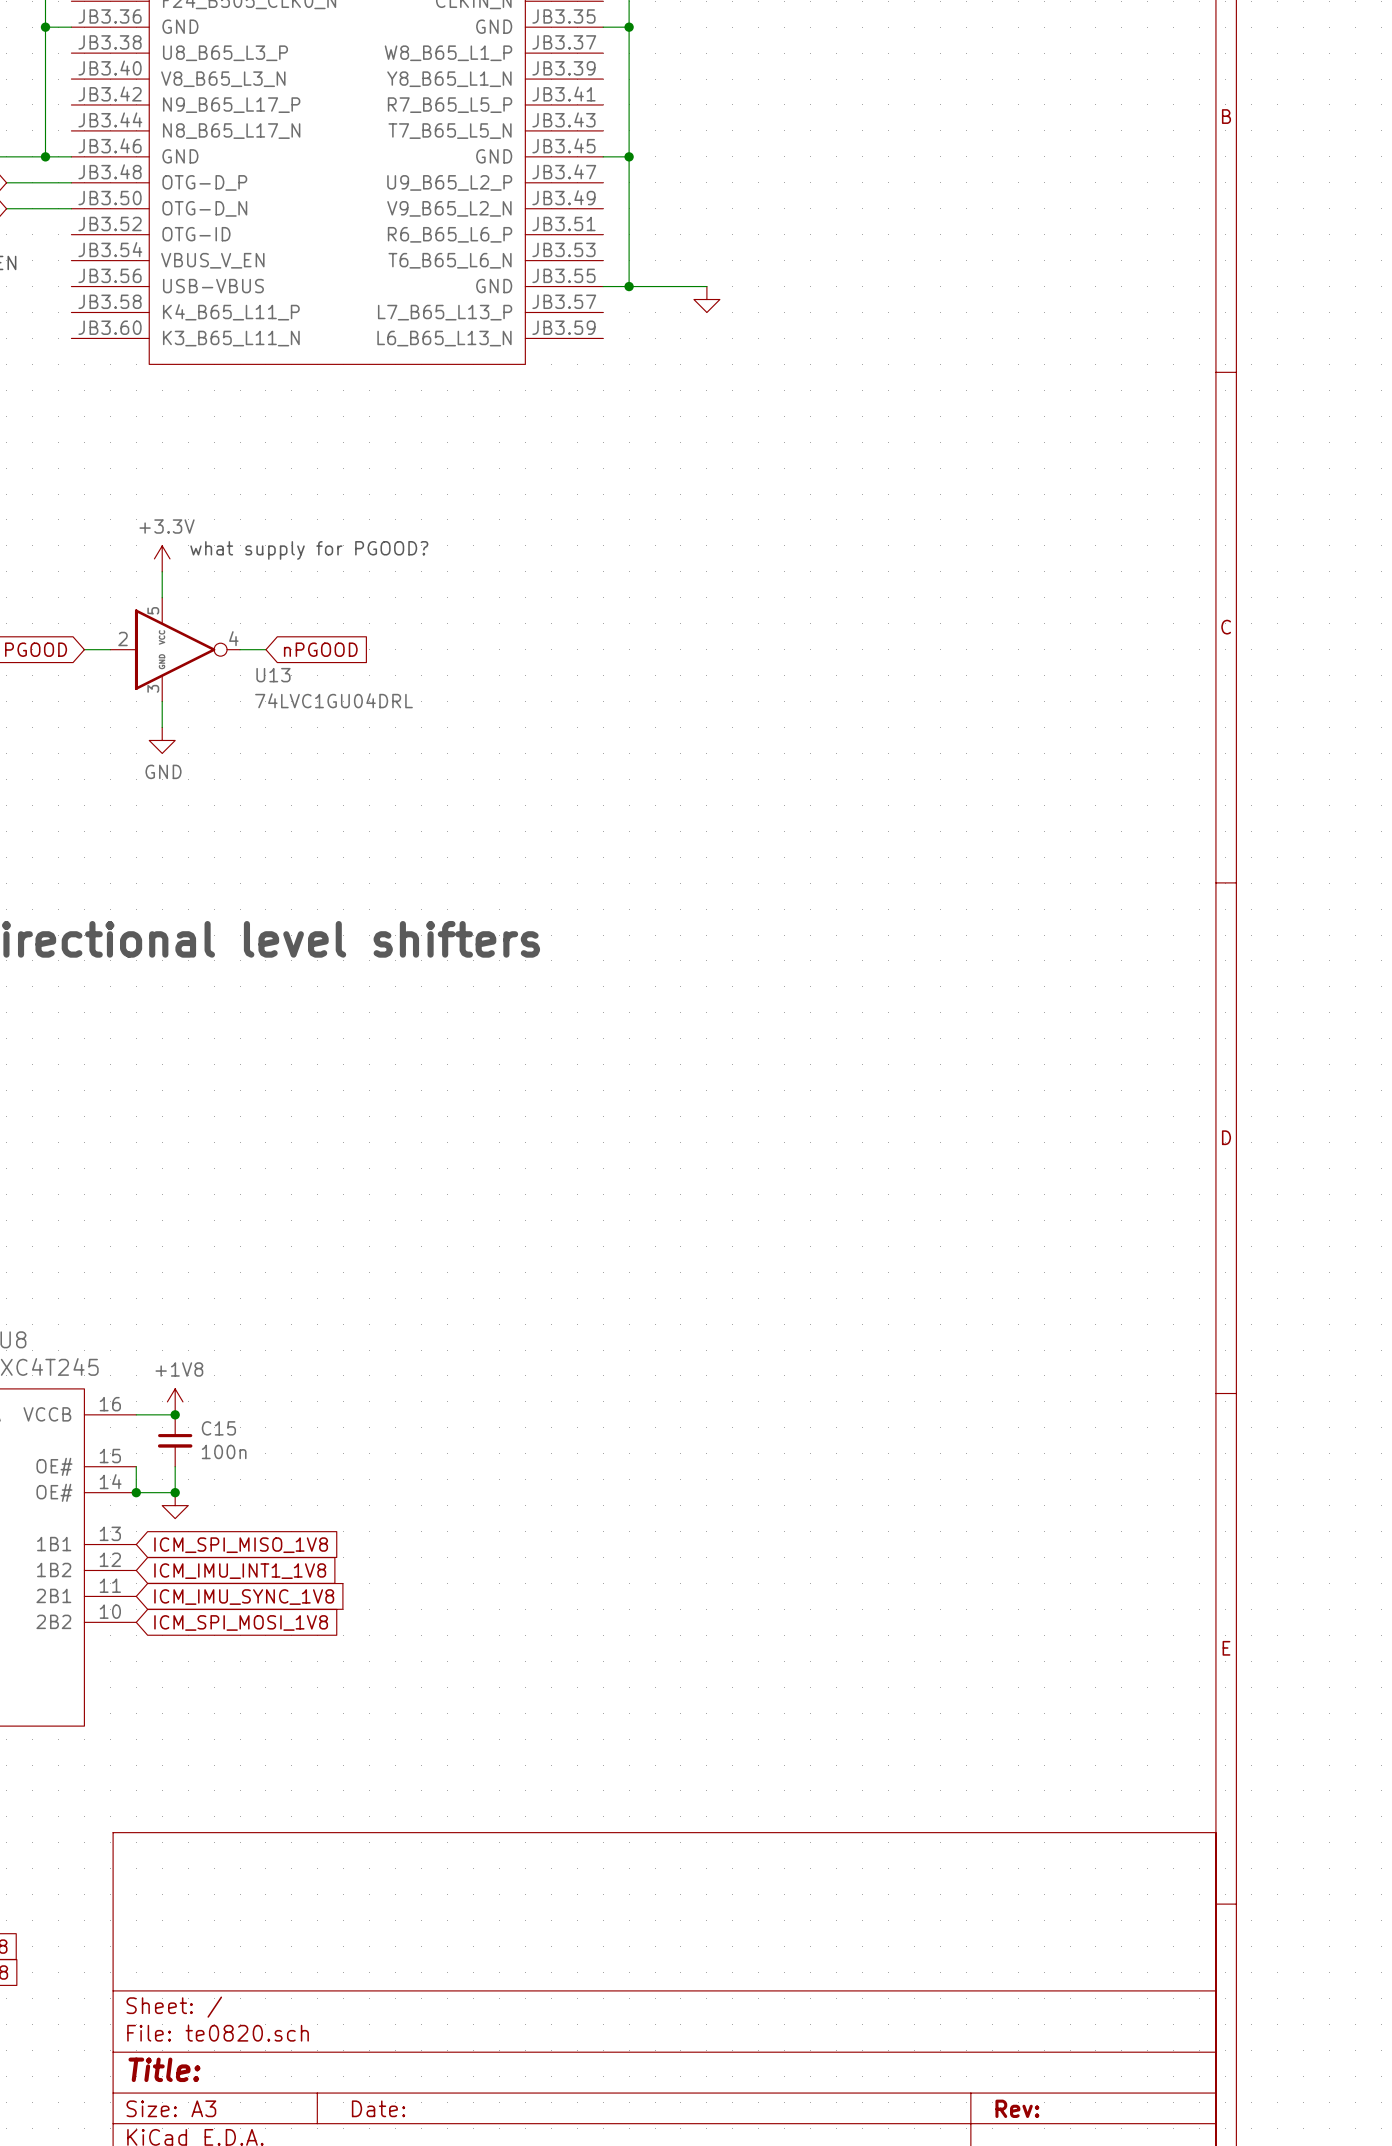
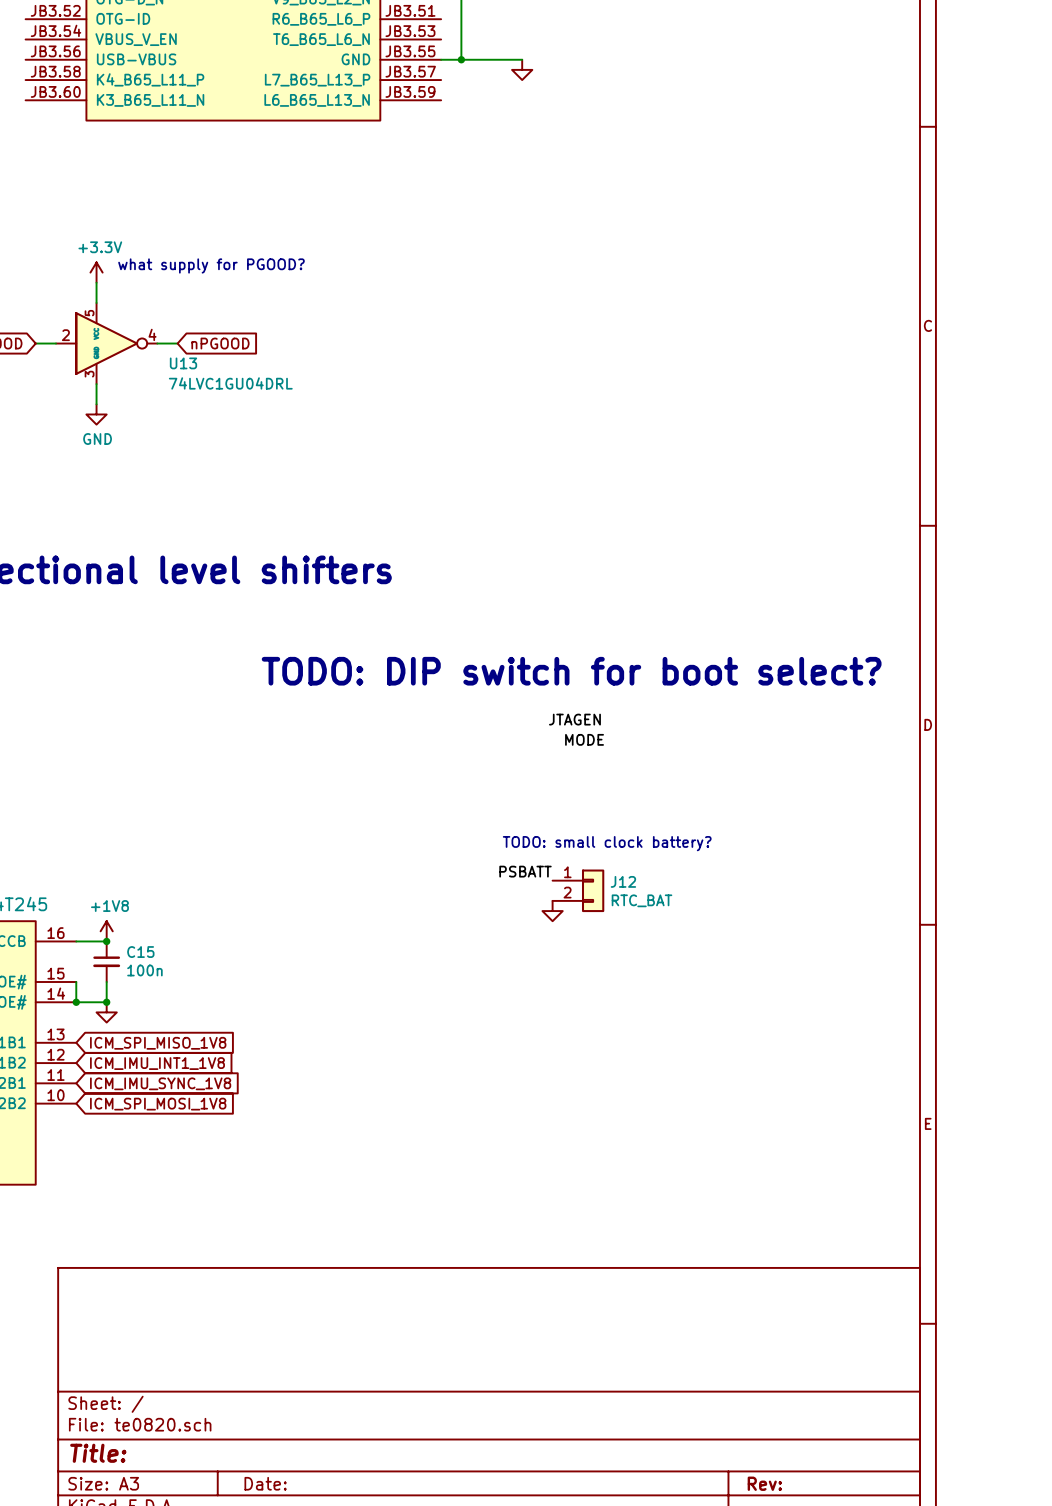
text: none -> TODO: DIP switch for boot select? (571, 671)
label: none -> JTAGEN (574, 719)
label: none -> MODE (584, 739)
text: none -> TODO: small clock battery? (607, 843)
label: none -> PSBATT (525, 871)
J12: none -> RTC_BAT (578, 890)
power symbol: none -> (552, 911)

